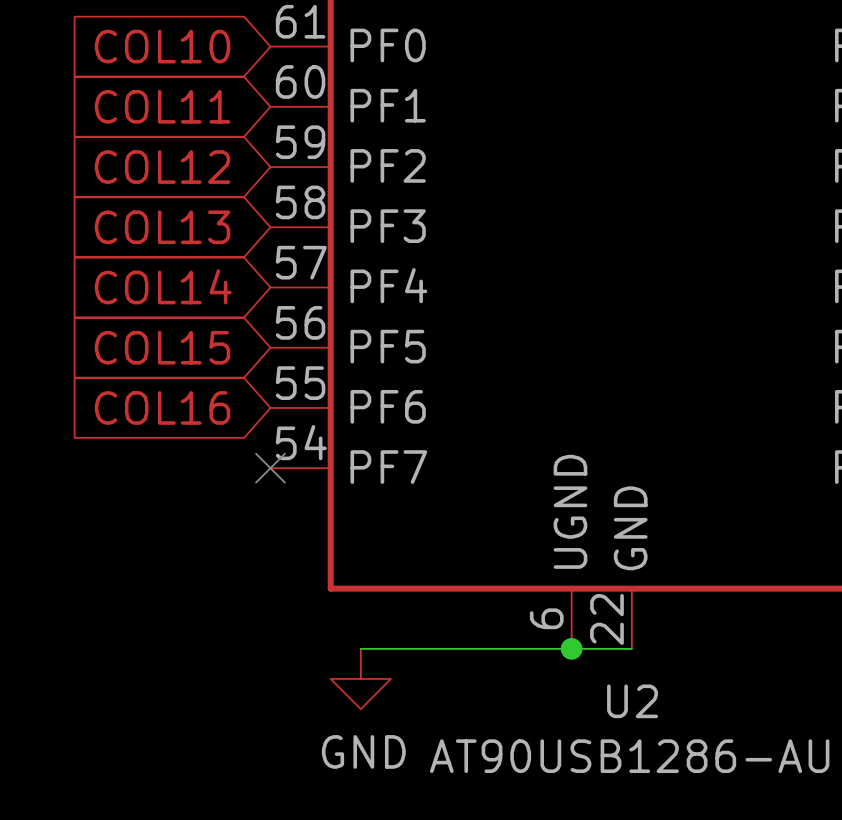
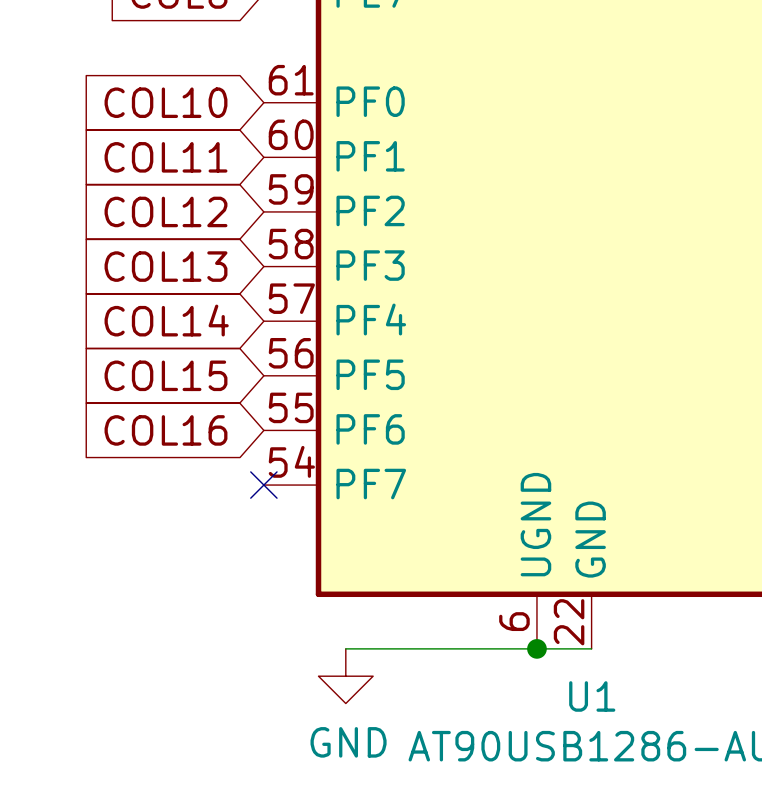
U2 name: U2 (632, 701) -> U1 (592, 696)

